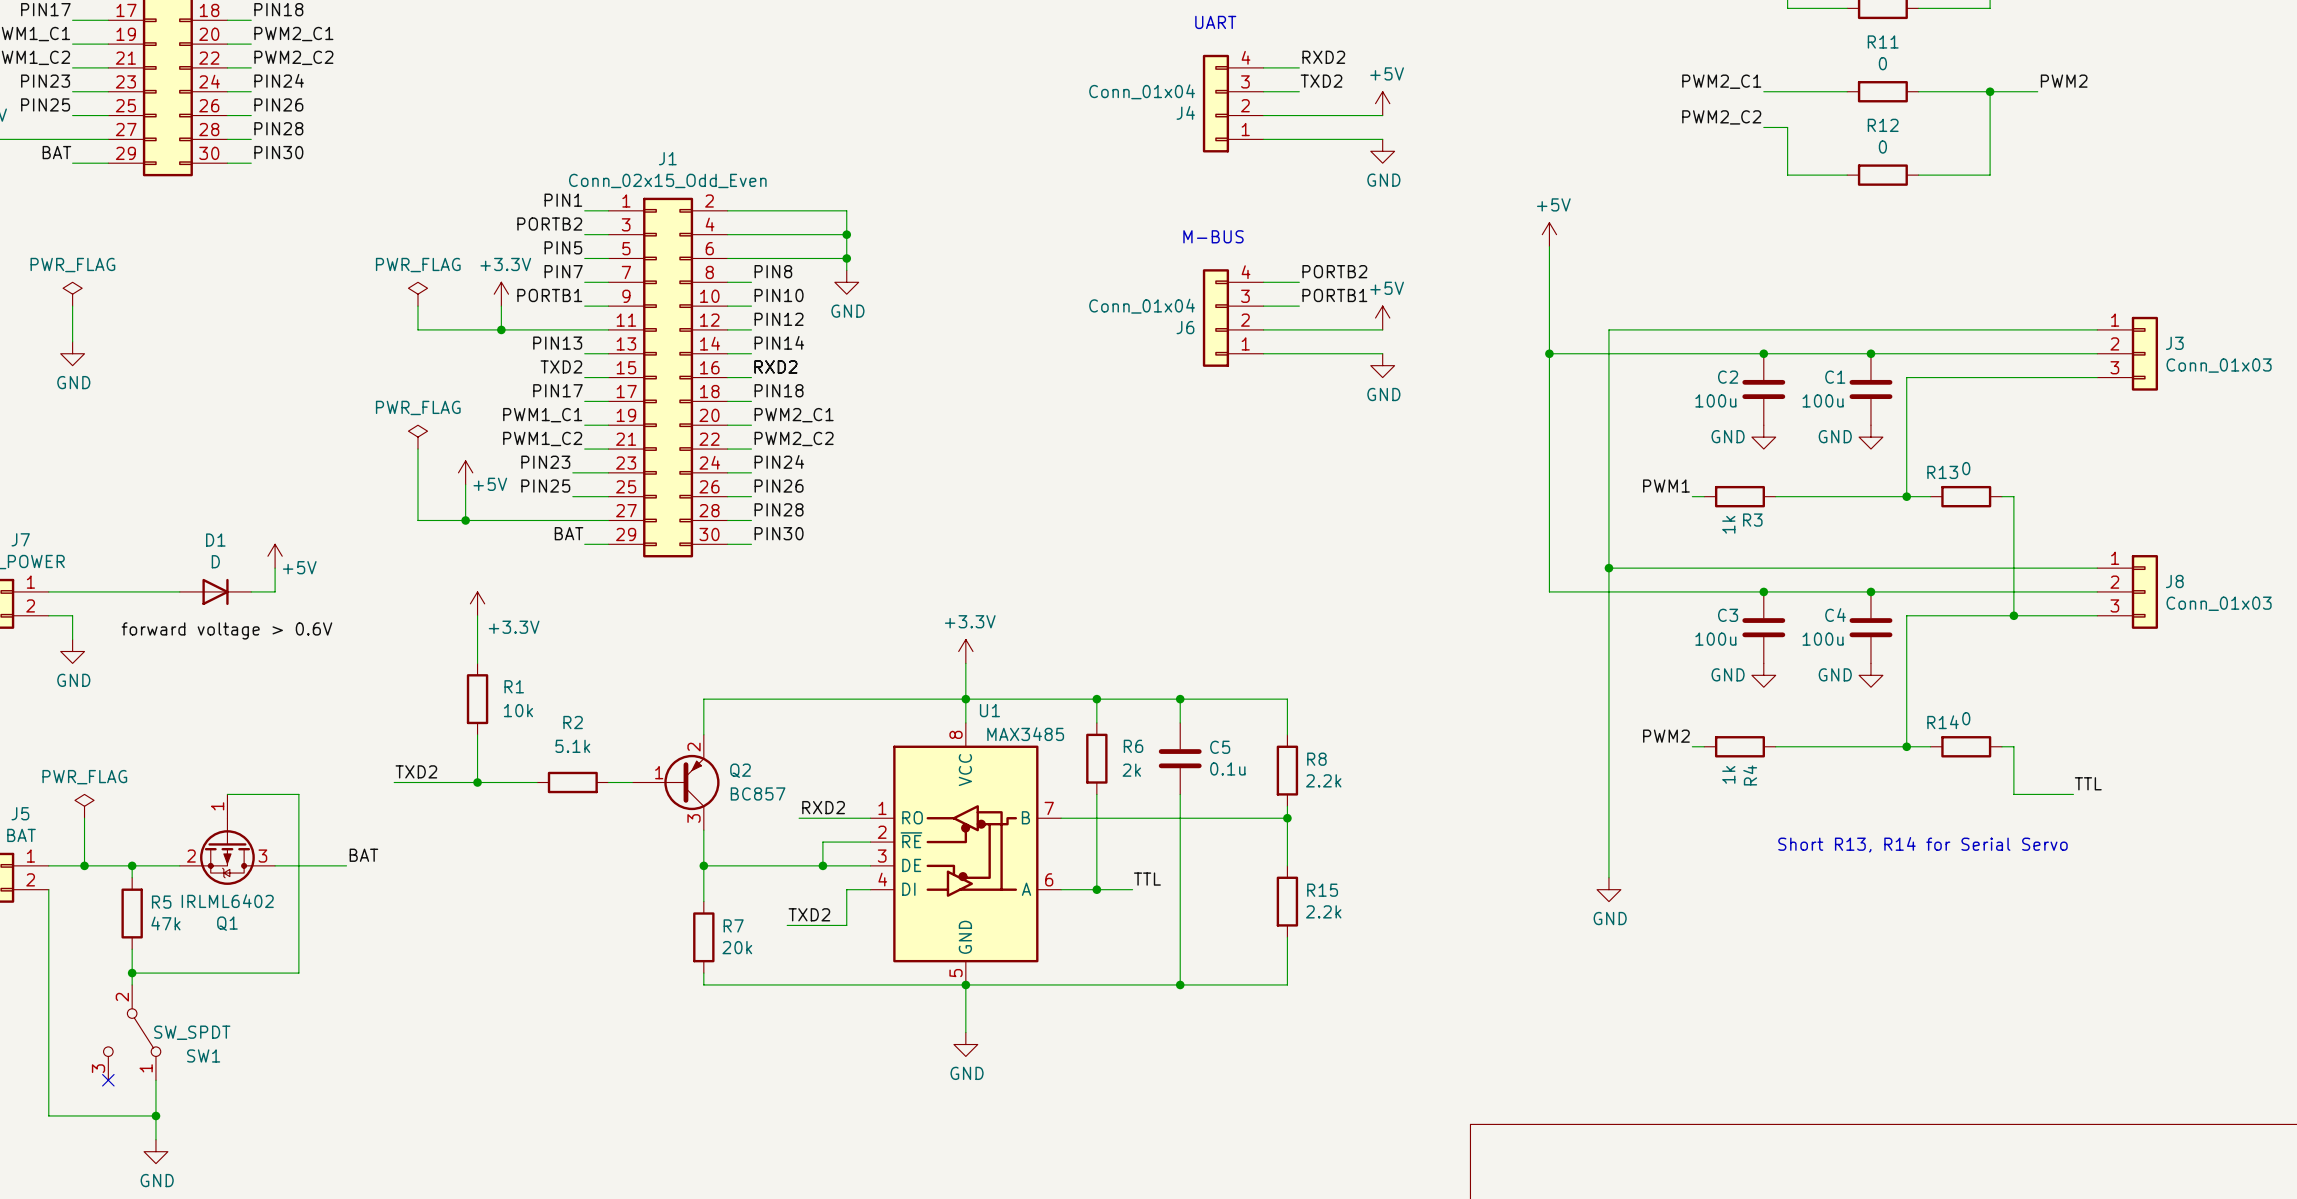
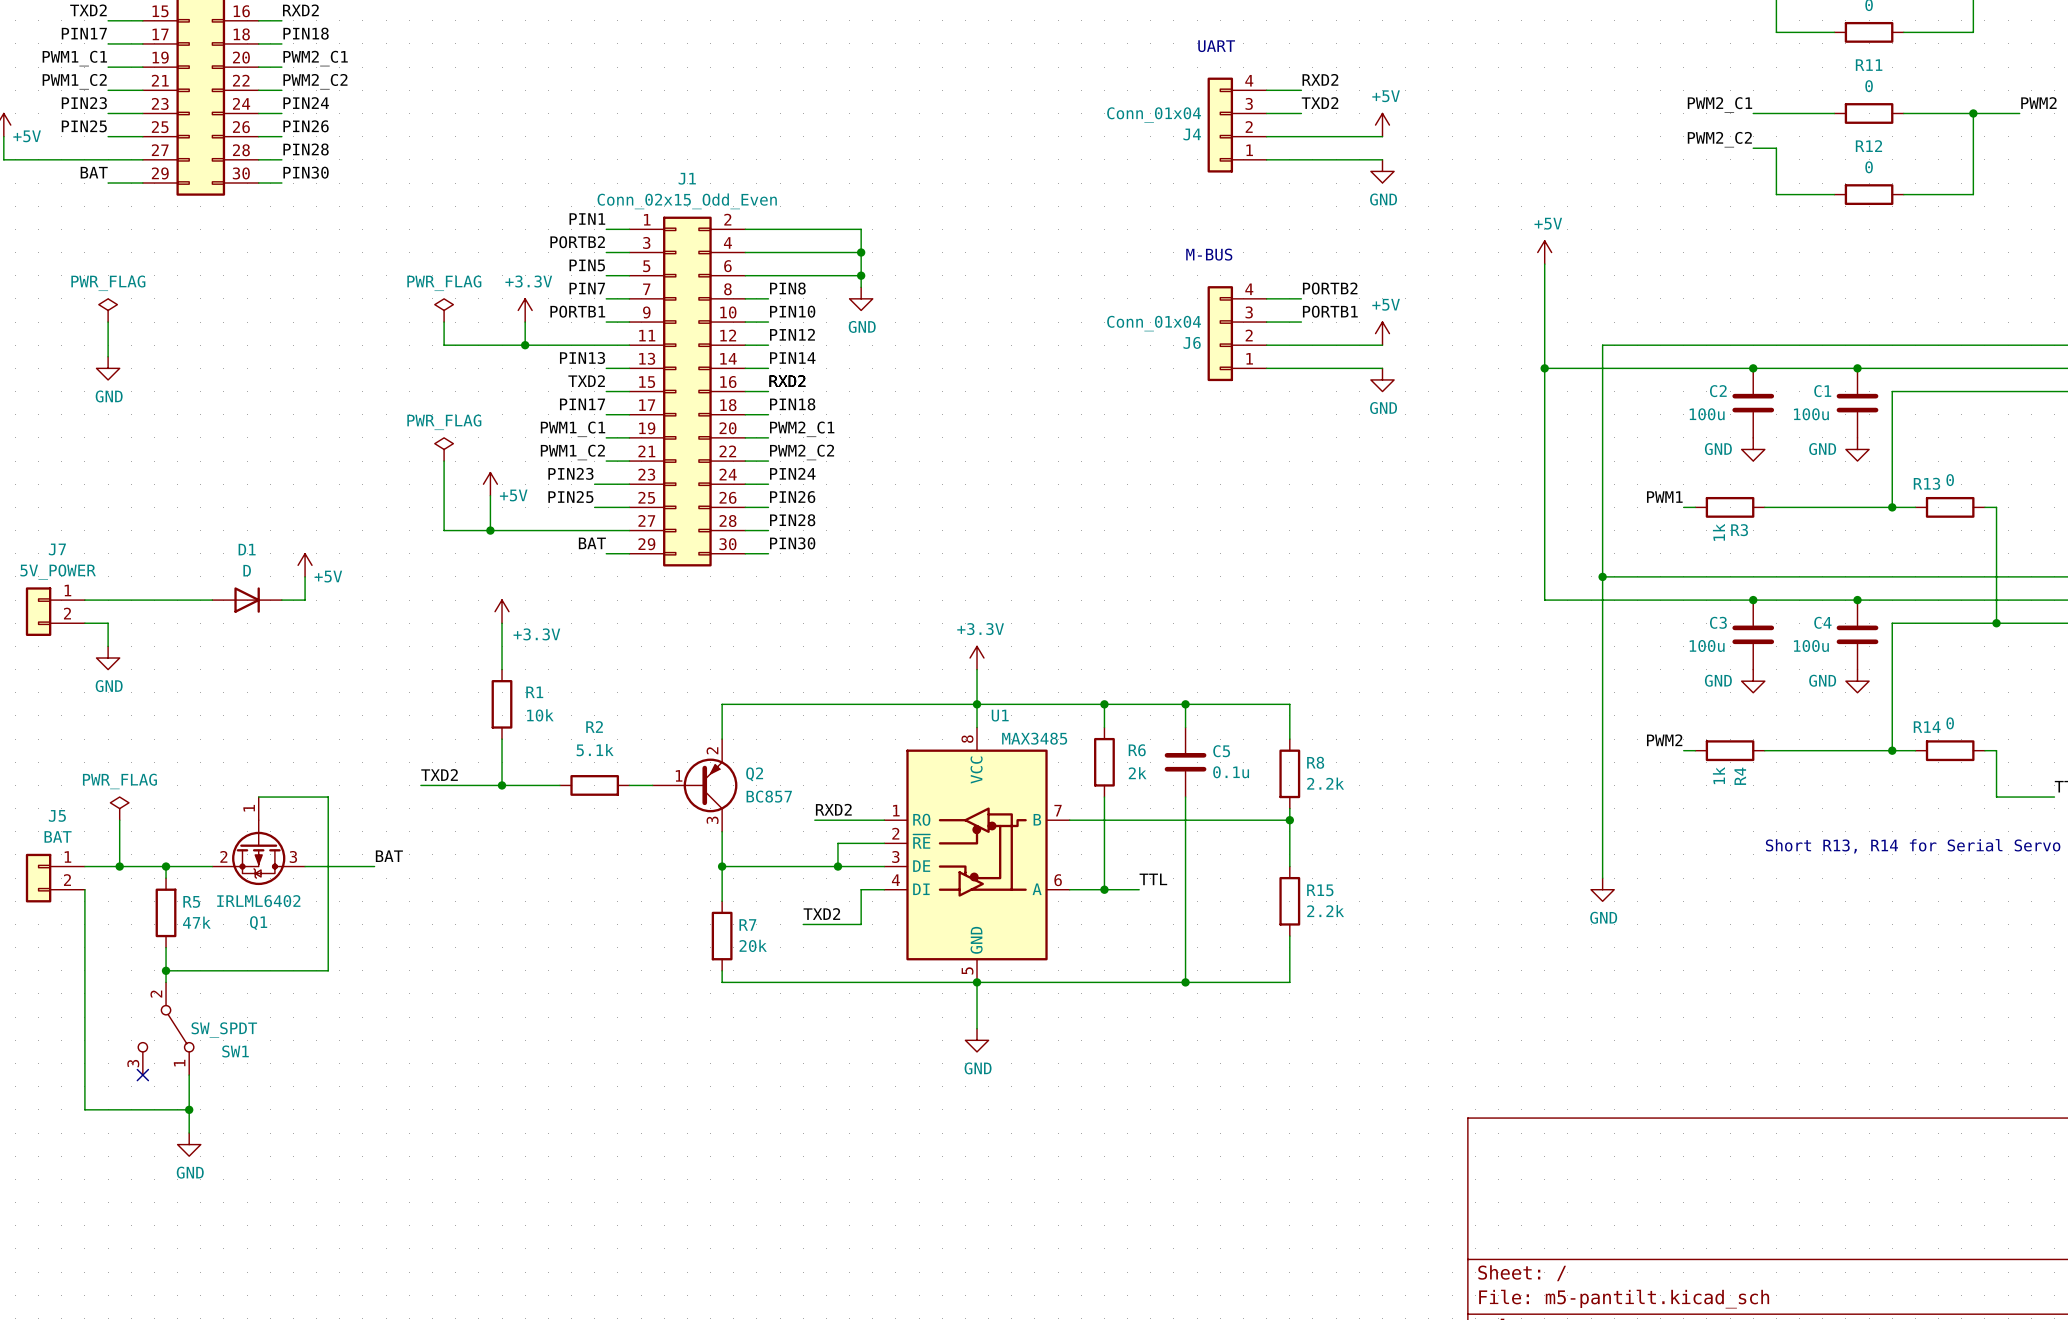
label: forward voltage > 0.6V (226, 630) -> none

